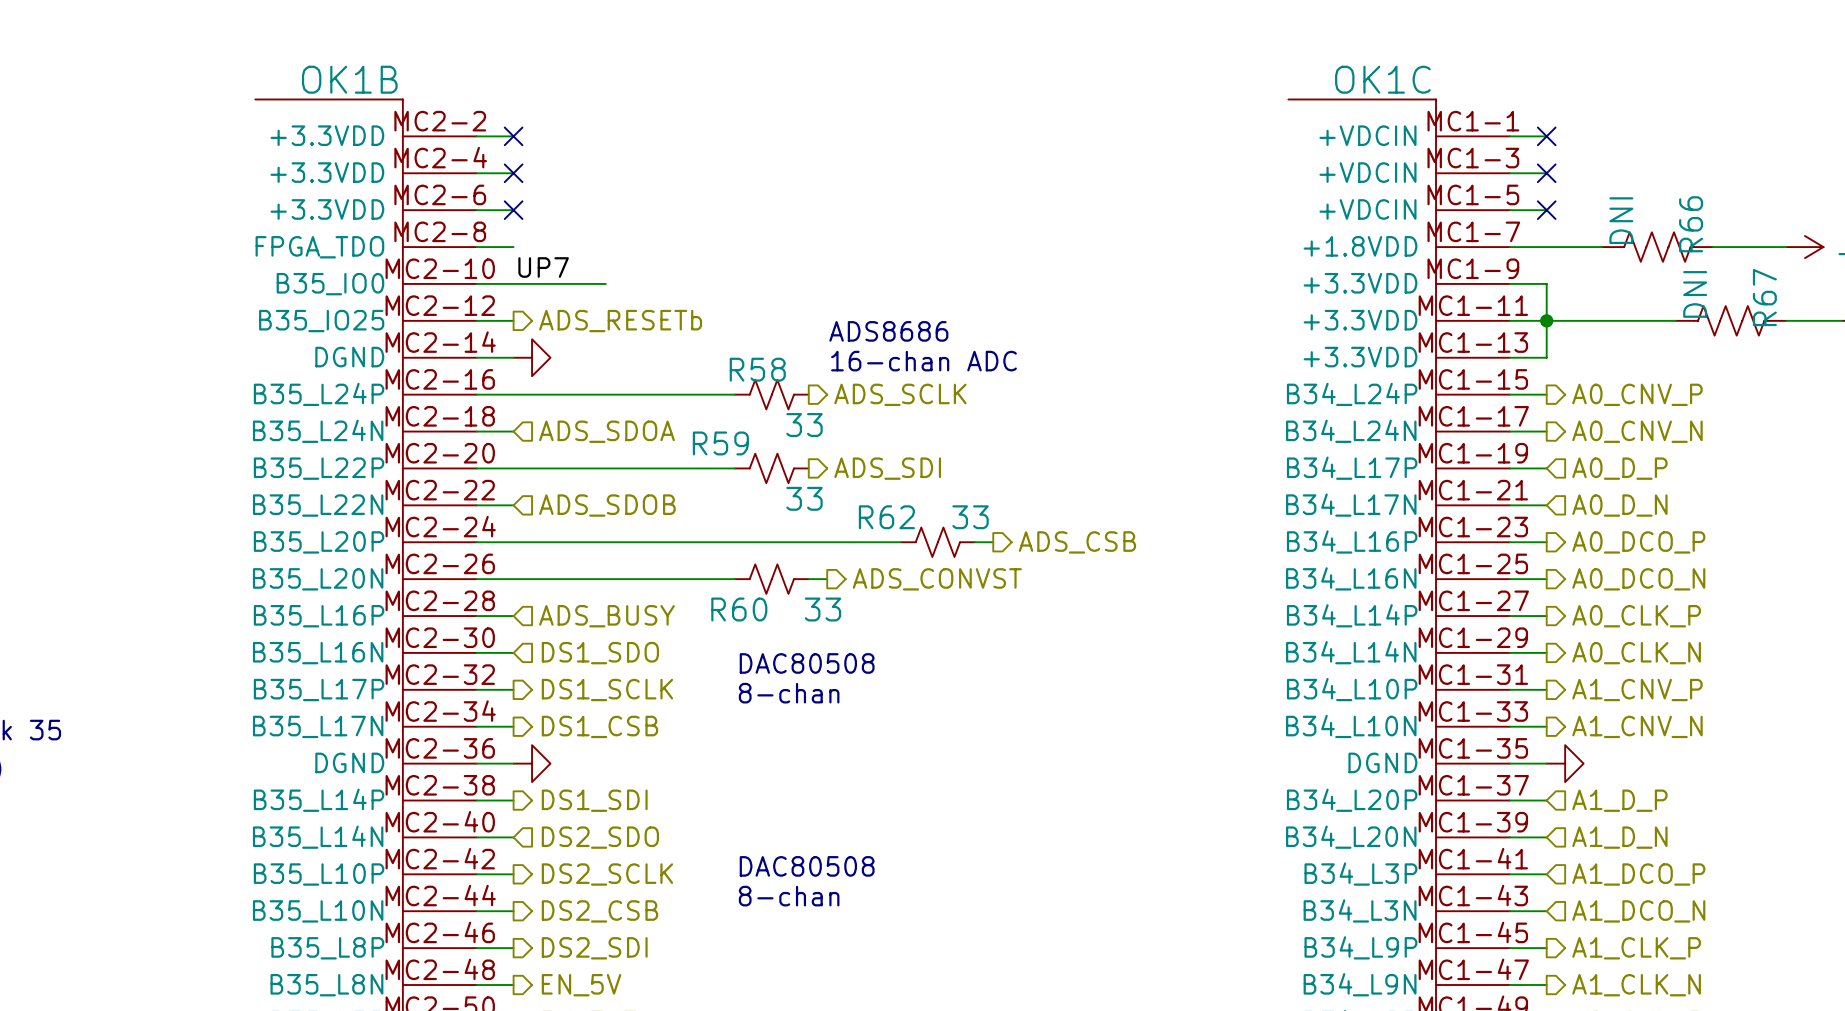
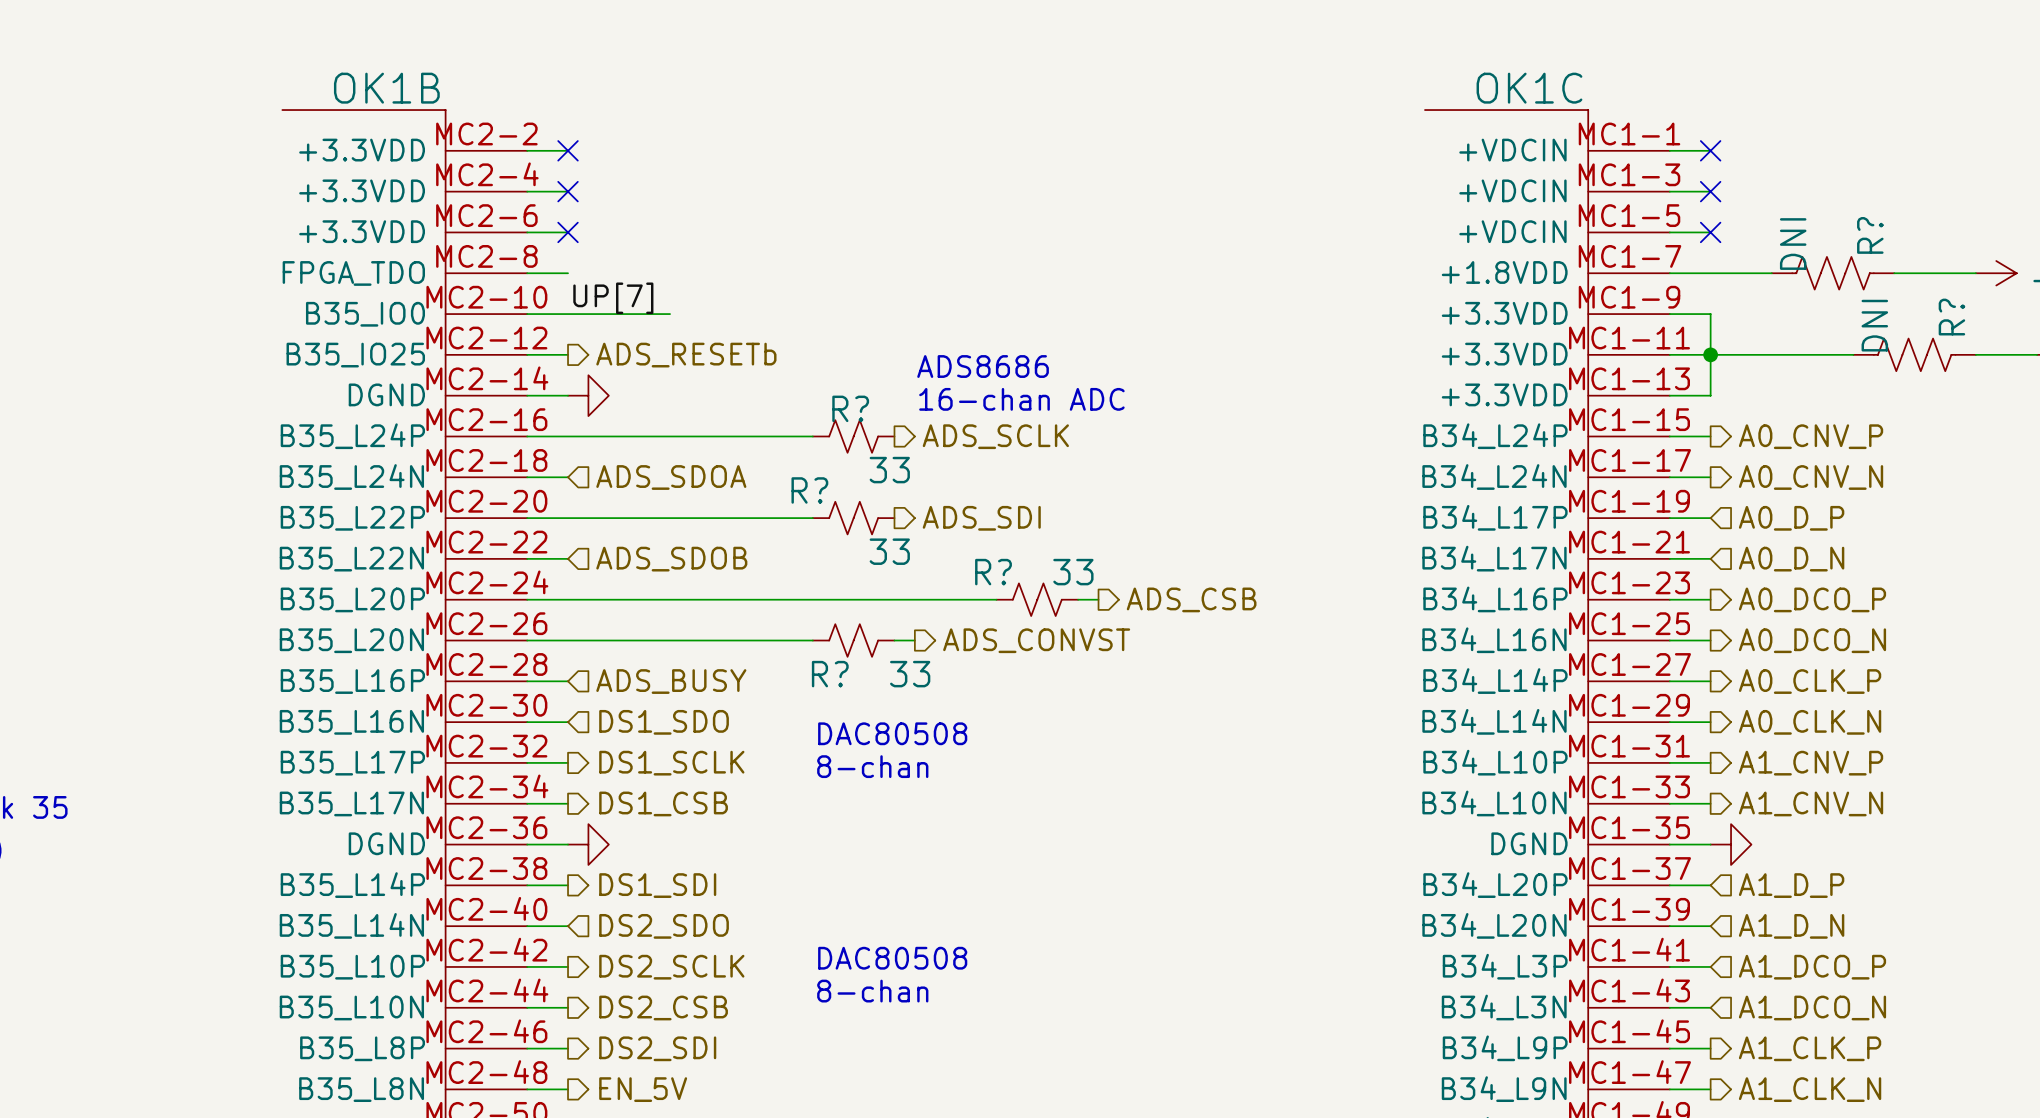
R66 name: R66 (1691, 224) -> R? (1870, 235)
label: UP7 (543, 267) -> UP[7] (613, 298)
R67 name: R67 (1764, 297) -> R? (1951, 317)
R58 name: R58 (757, 369) -> R? (850, 408)
R59 name: R59 (720, 443) -> R? (809, 490)
R62 name: R62 (886, 517) -> R? (993, 572)
R60 name: R60 (739, 609) -> R? (830, 674)

